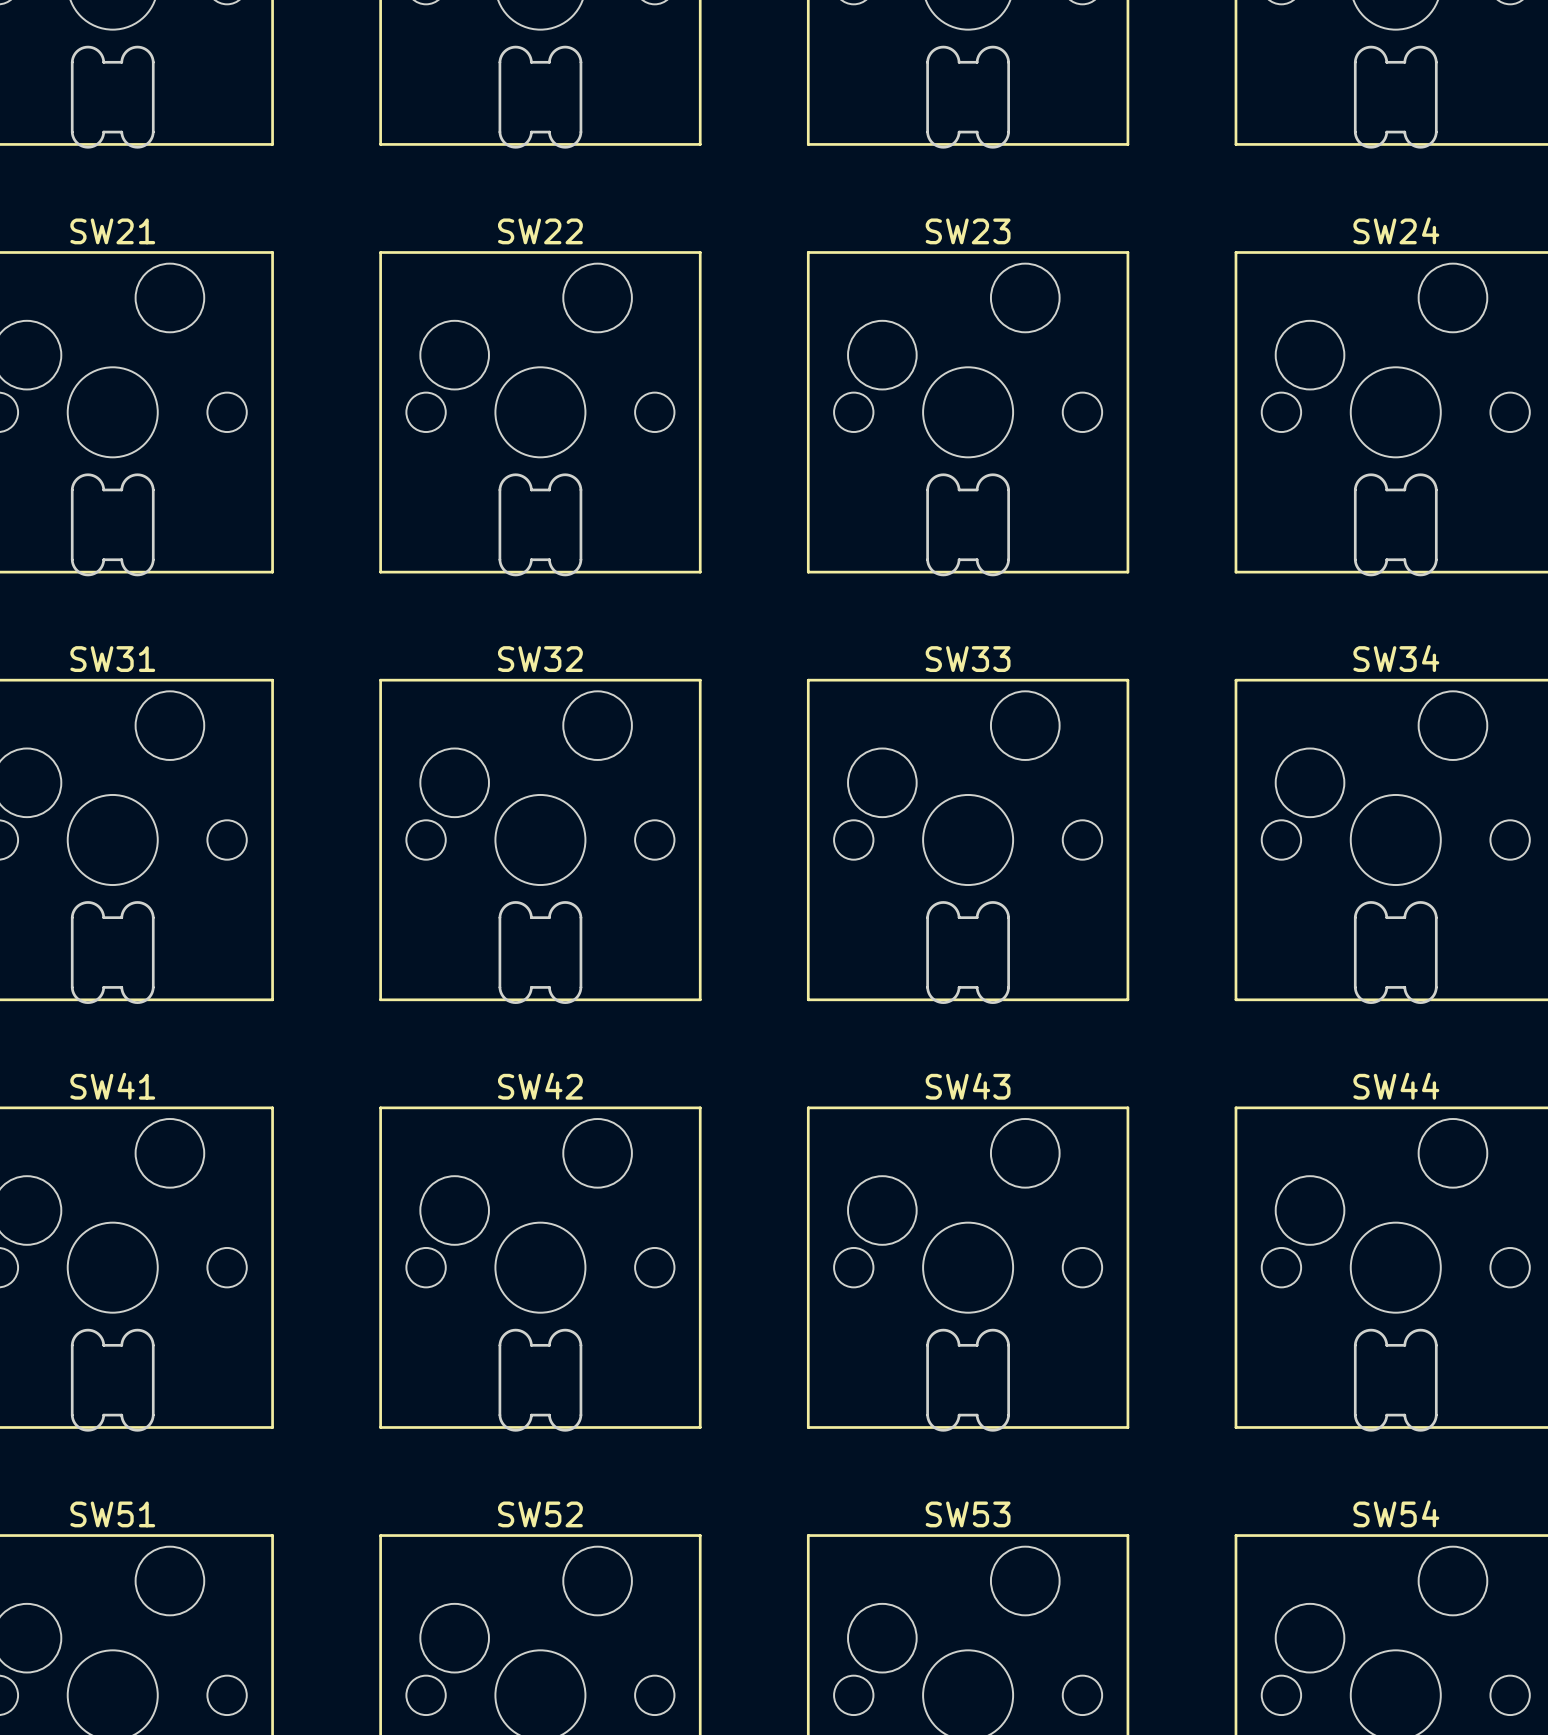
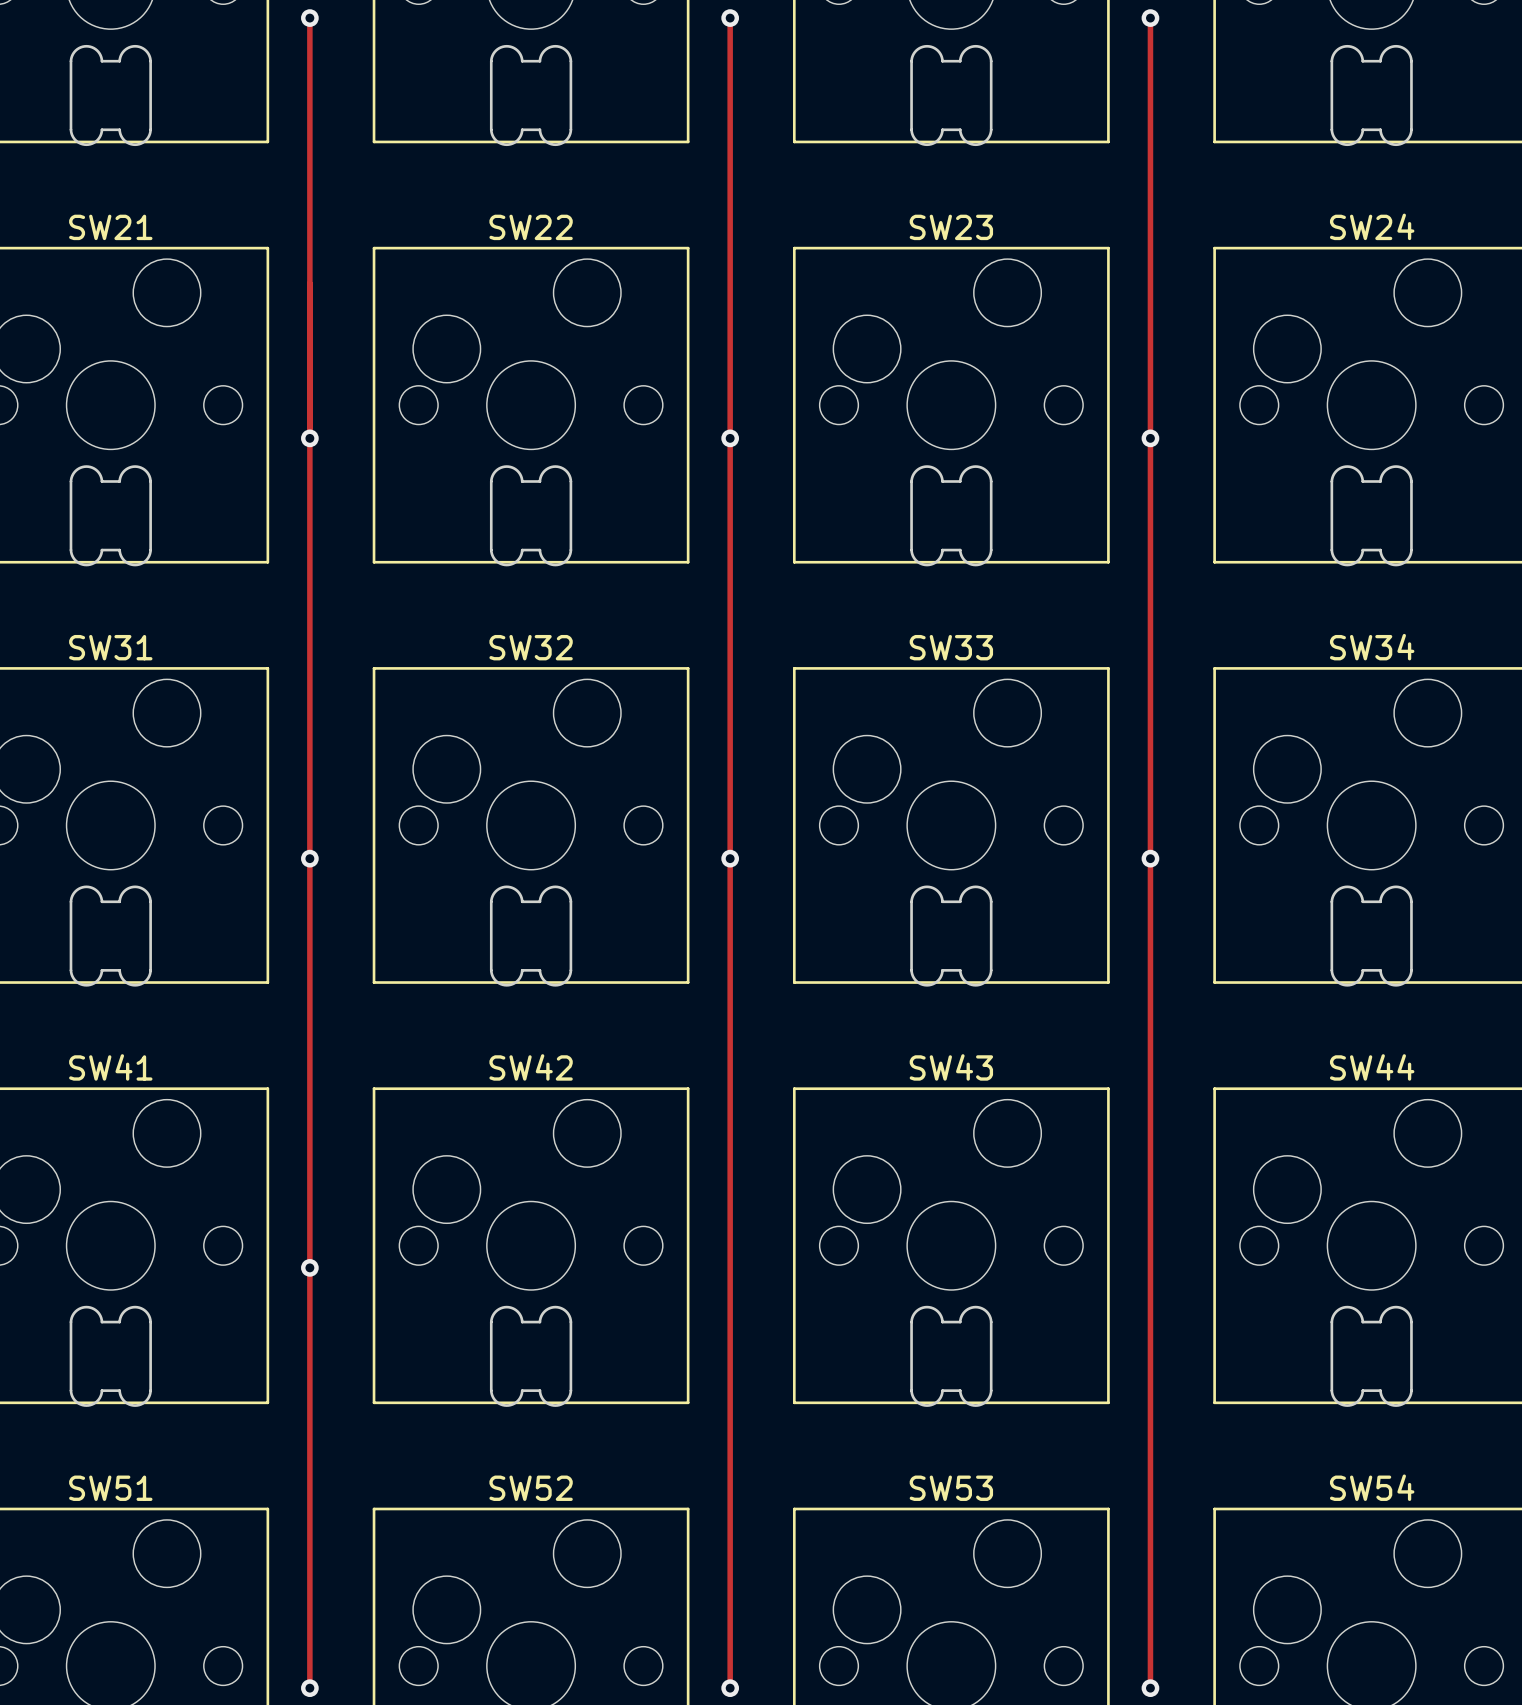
track: none -> (309, 18) (309, 1688)
via: none -> (309, 18)
track: none -> (730, 18) (730, 1688)
via: none -> (730, 18)
track: none -> (1150, 18) (1150, 1688)
via: none -> (1150, 18)
via: none -> (309, 438)
via: none -> (730, 438)
via: none -> (1150, 438)
via: none -> (309, 858)
via: none -> (730, 858)
via: none -> (1150, 858)
via: none -> (309, 1267)
via: none -> (309, 1688)
via: none -> (730, 1688)
via: none -> (1150, 1688)

